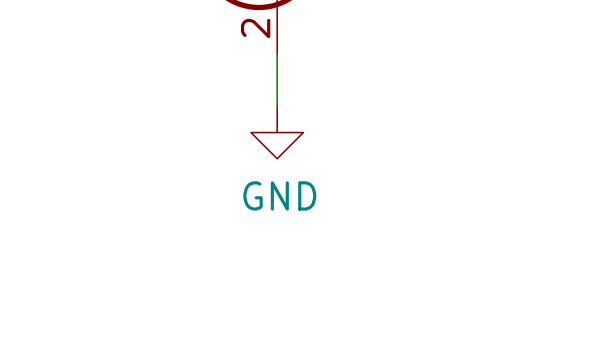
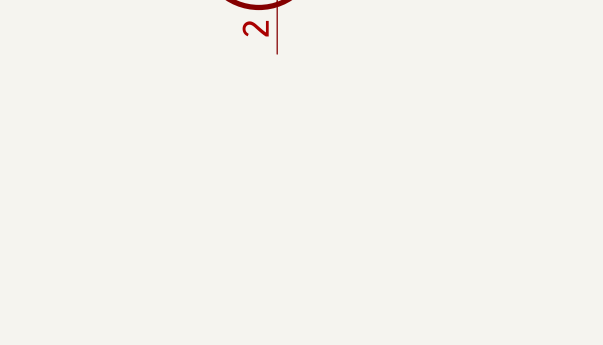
wire: (277, 54) (277, 106) -> none
power symbol: GND (277, 132) -> none

